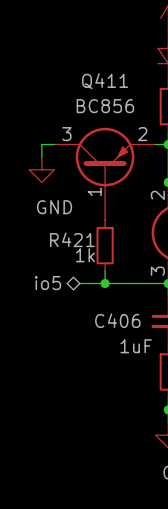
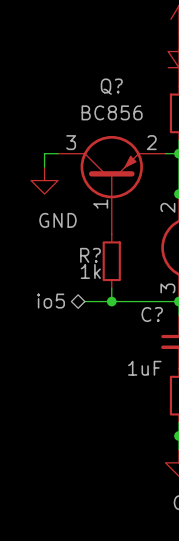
Q411 name: Q411 (105, 81) -> Q? (111, 86)
R421 name: R421 (72, 239) -> R? (90, 255)
C406 name: C406 (117, 320) -> C? (152, 314)

